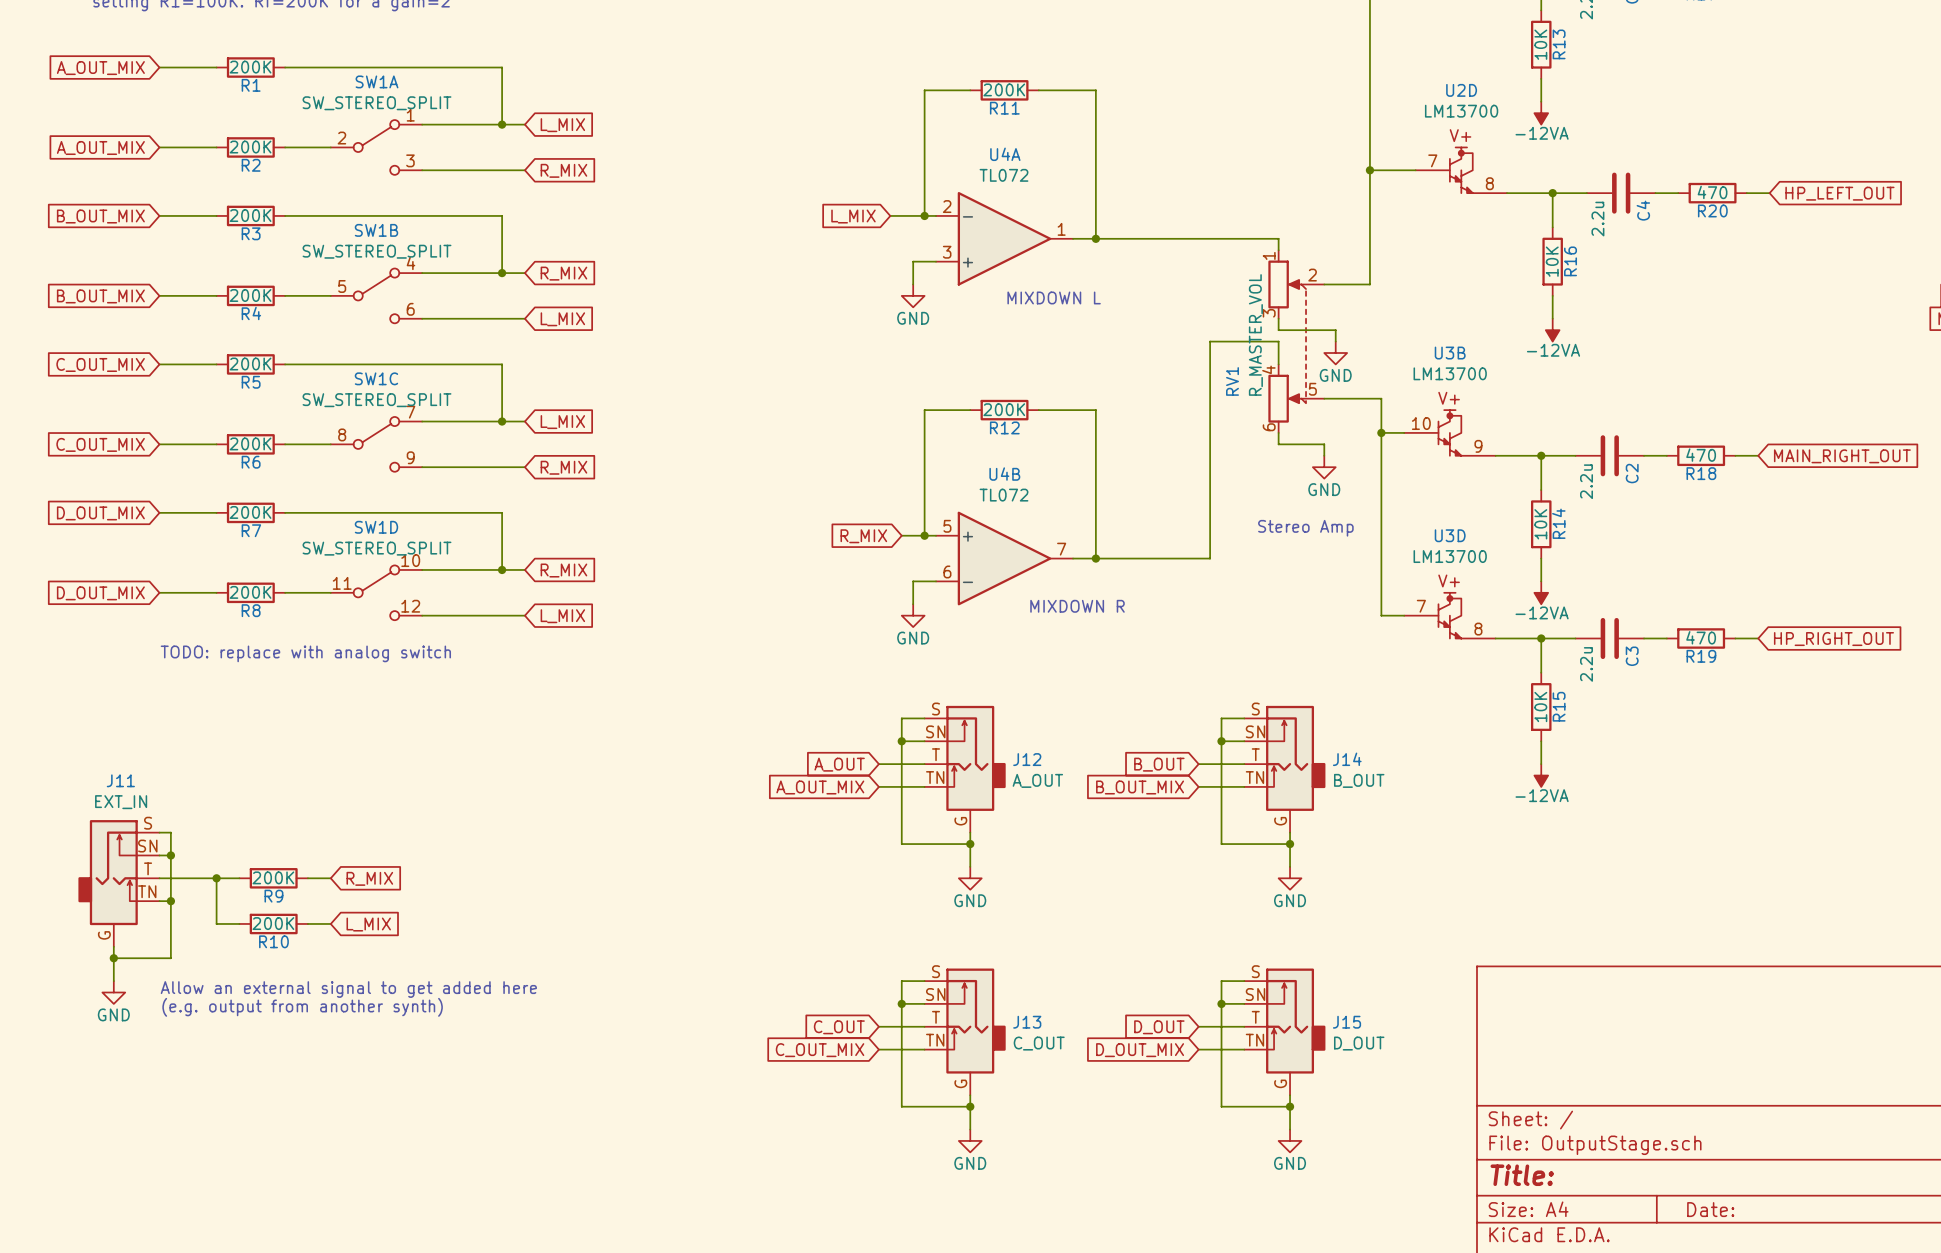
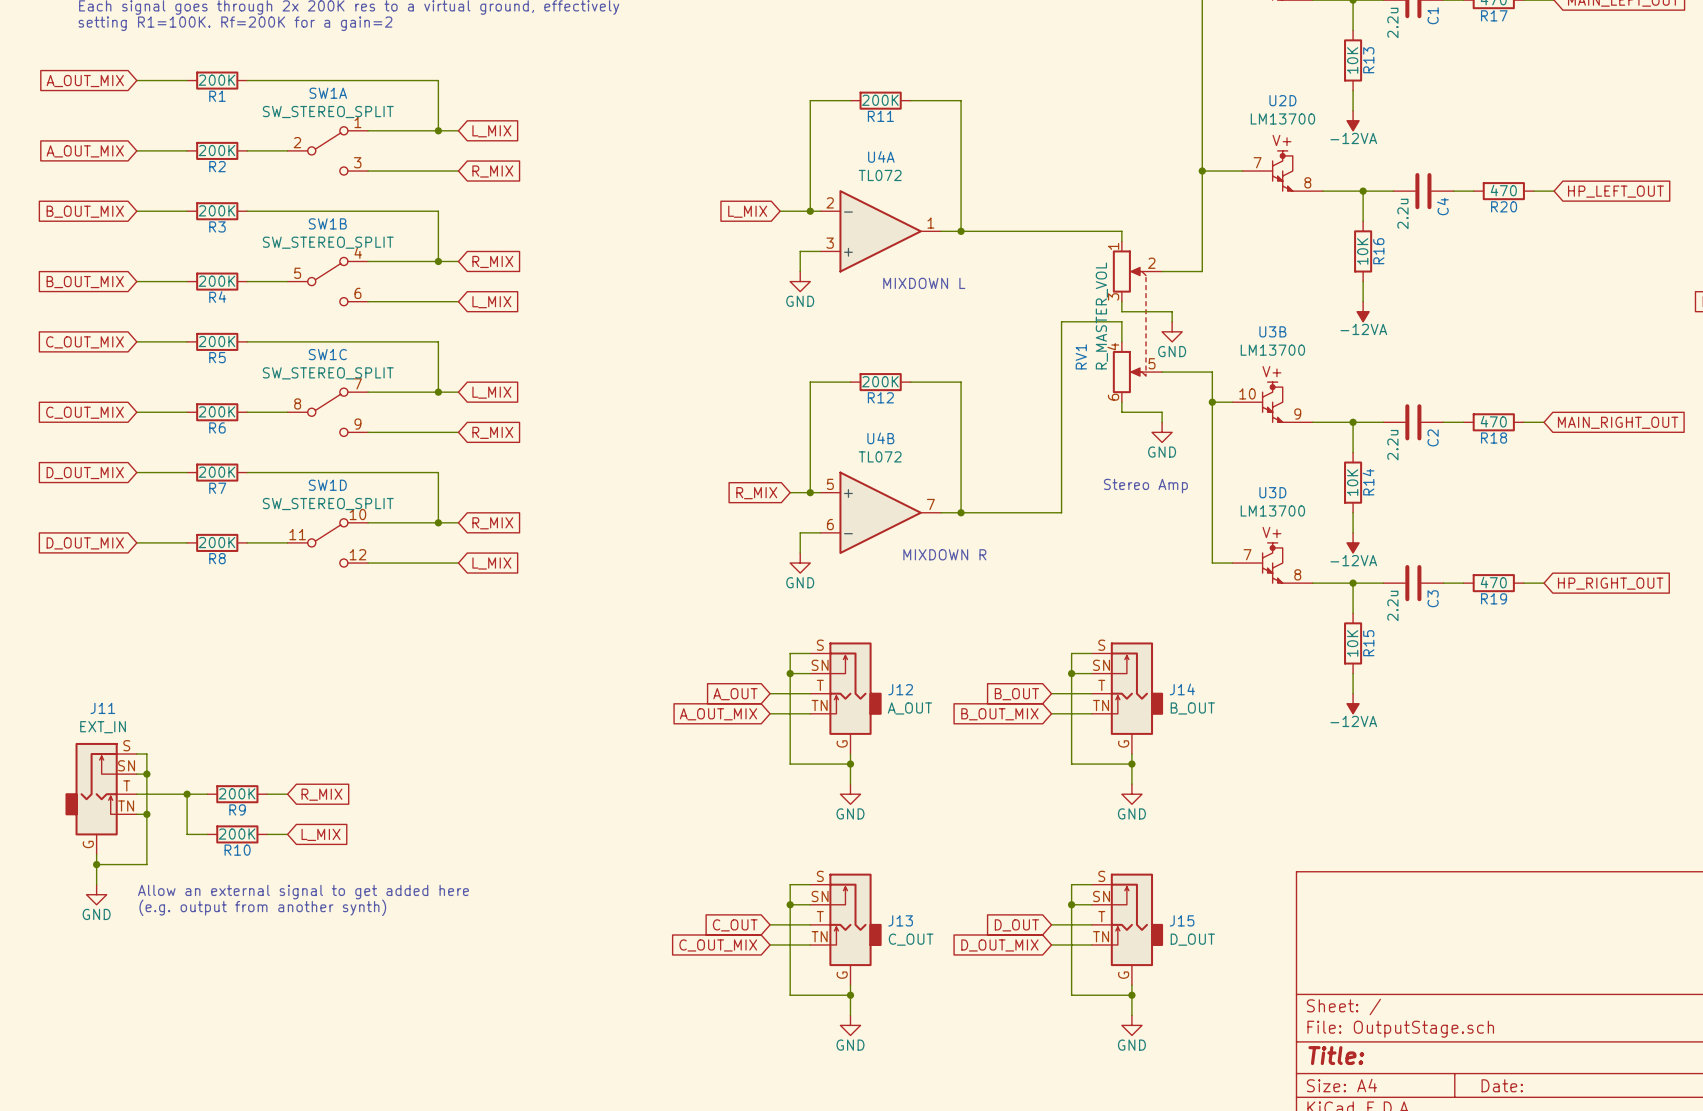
text: TODO: replace with analog switch (305, 653) -> none

